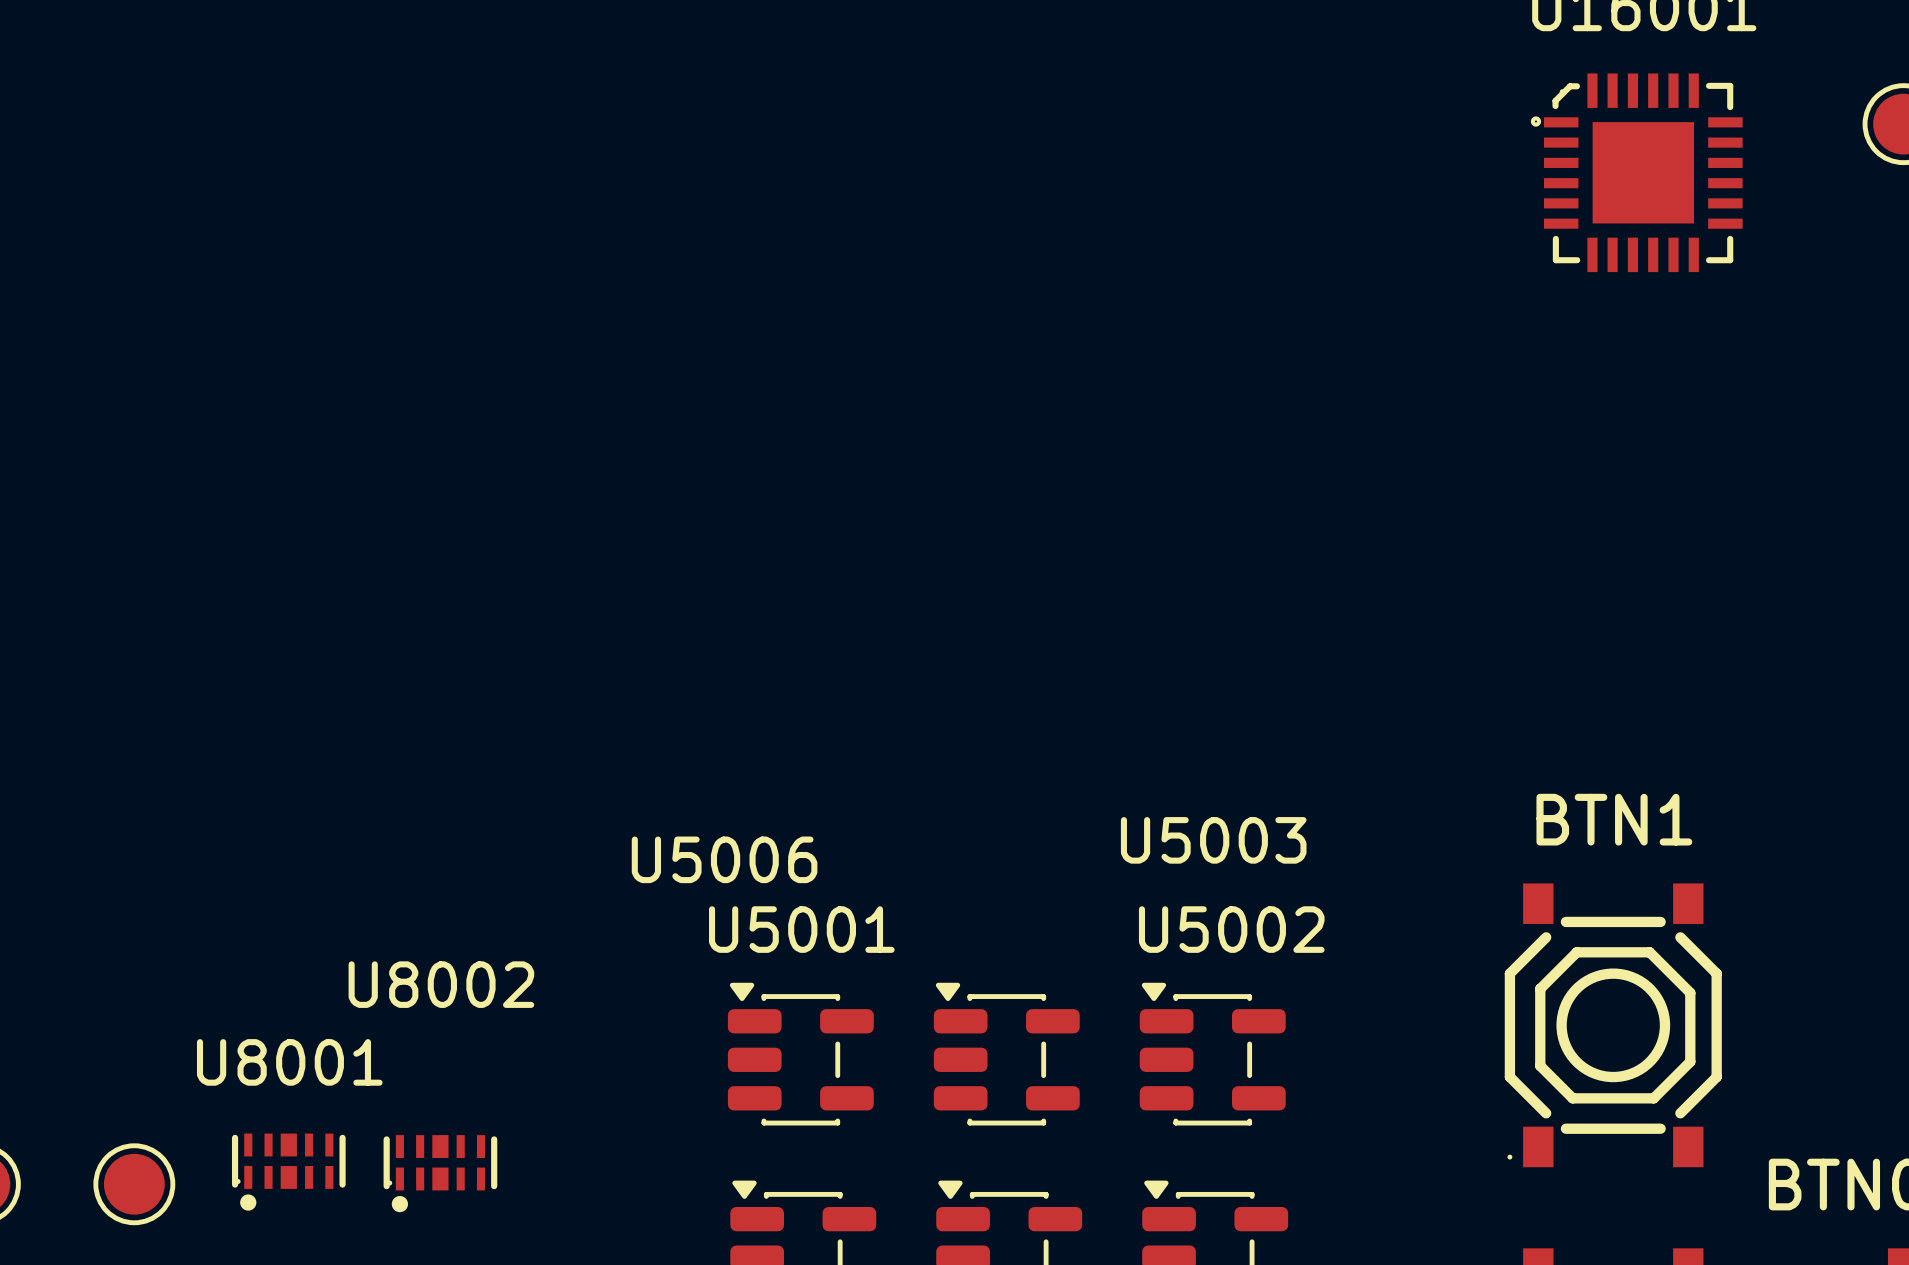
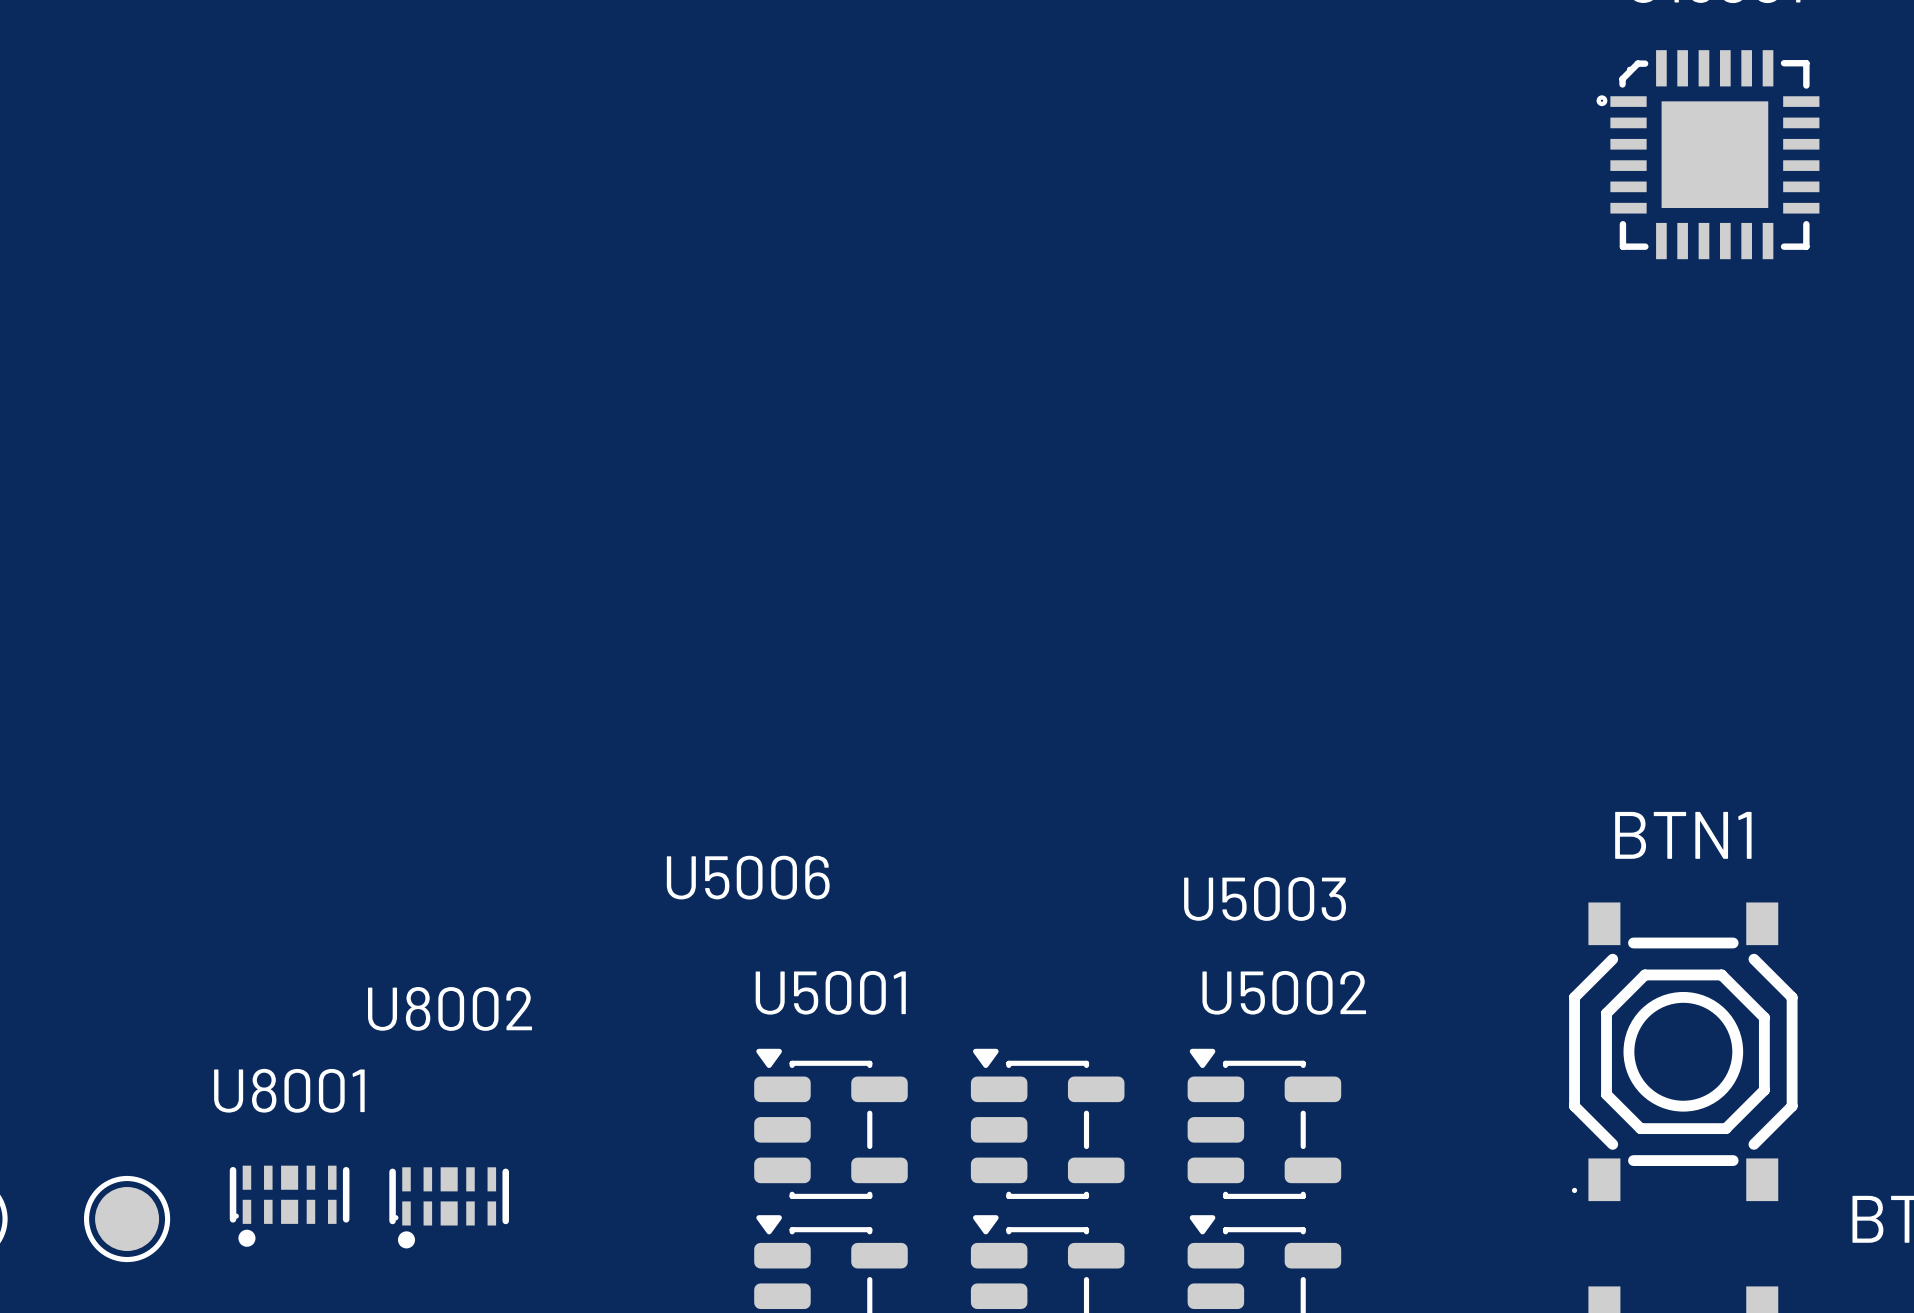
U5001 position: (800, 1054) -> (830, 1123)
U5002 position: (1006, 1054) -> (1047, 1123)
U5003 position: (1212, 1054) -> (1264, 1123)

